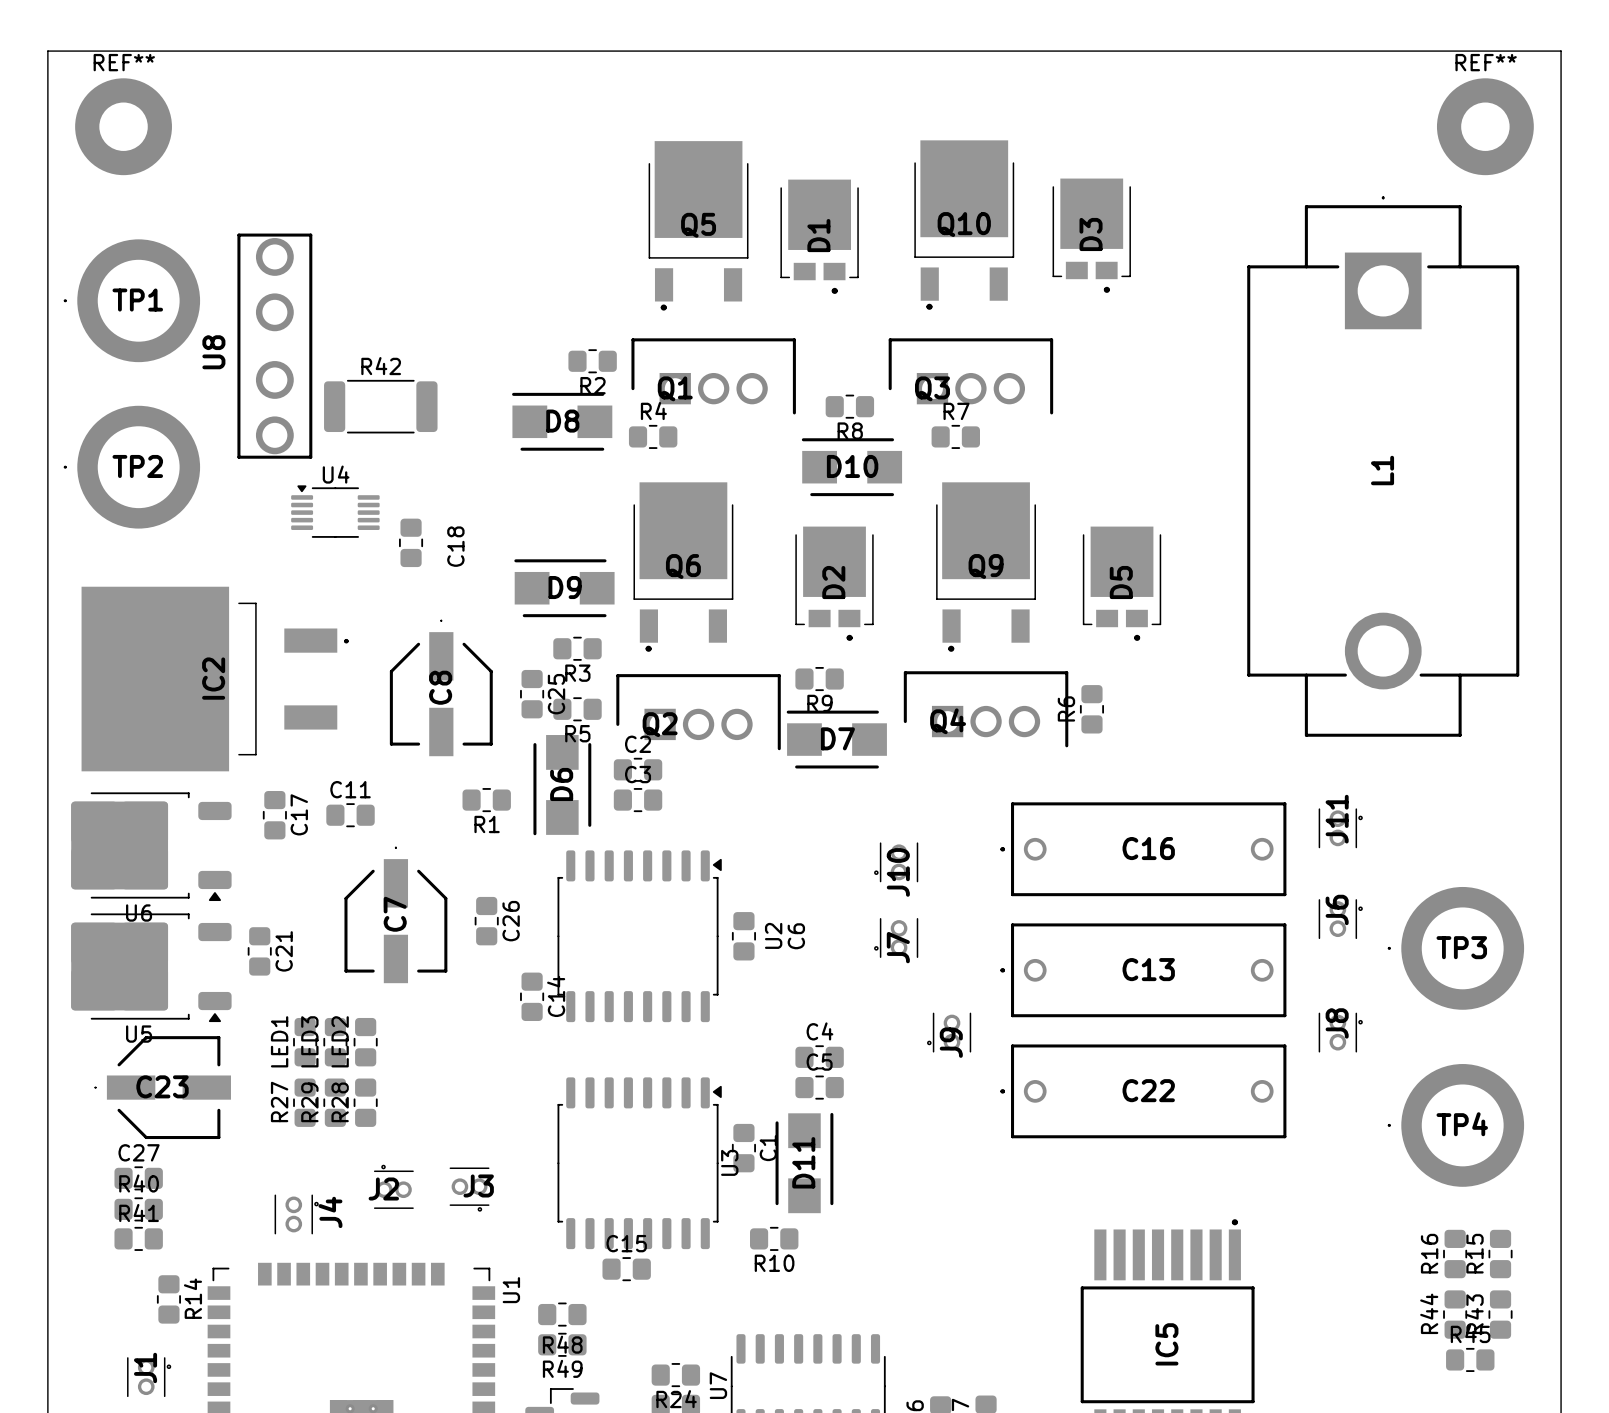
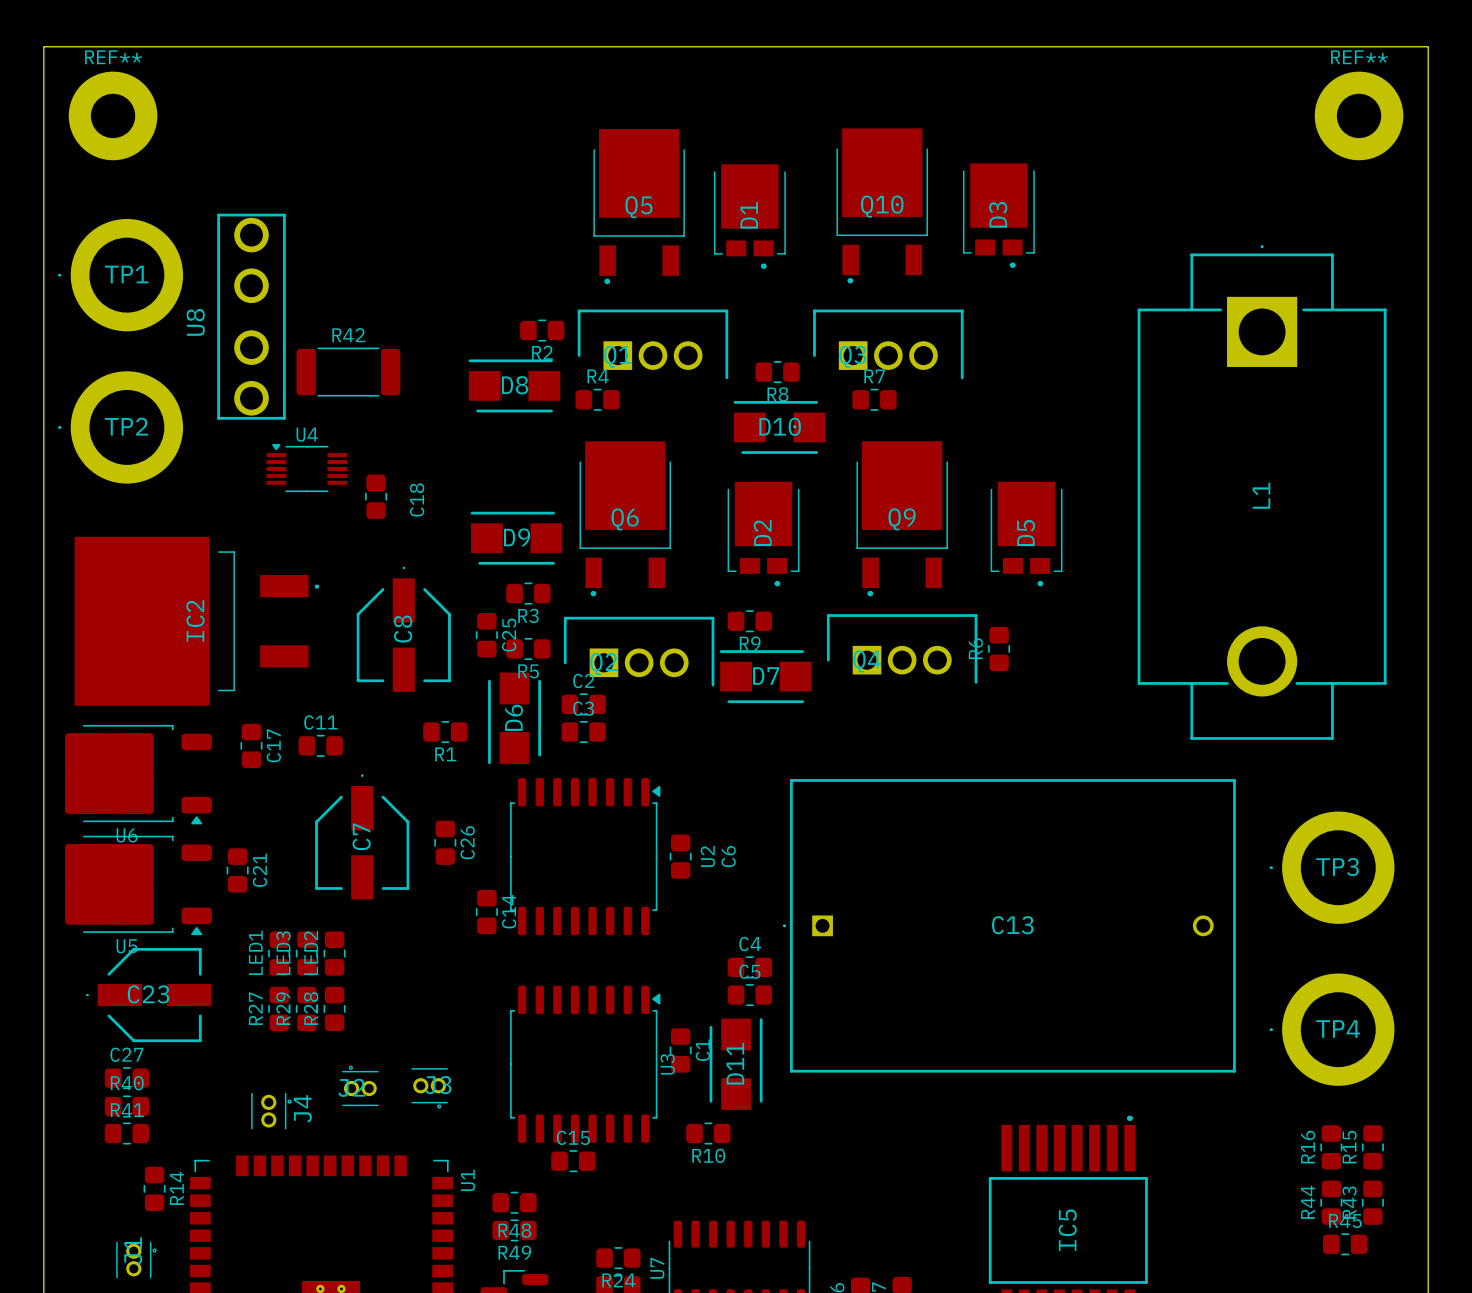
L1 position: (1383, 466) -> (1262, 492)
J11: (1340, 828) -> none
C16: (1143, 849) -> none
J10: (896, 862) -> none
J6: (1340, 919) -> none
C13 footprint: [1000, 923, 1287, 1018] -> [783, 779, 1236, 1073]
J7: (896, 938) -> none
J9: (949, 1032) -> none
J8: (1340, 1032) -> none
C22: (1143, 1091) -> none

